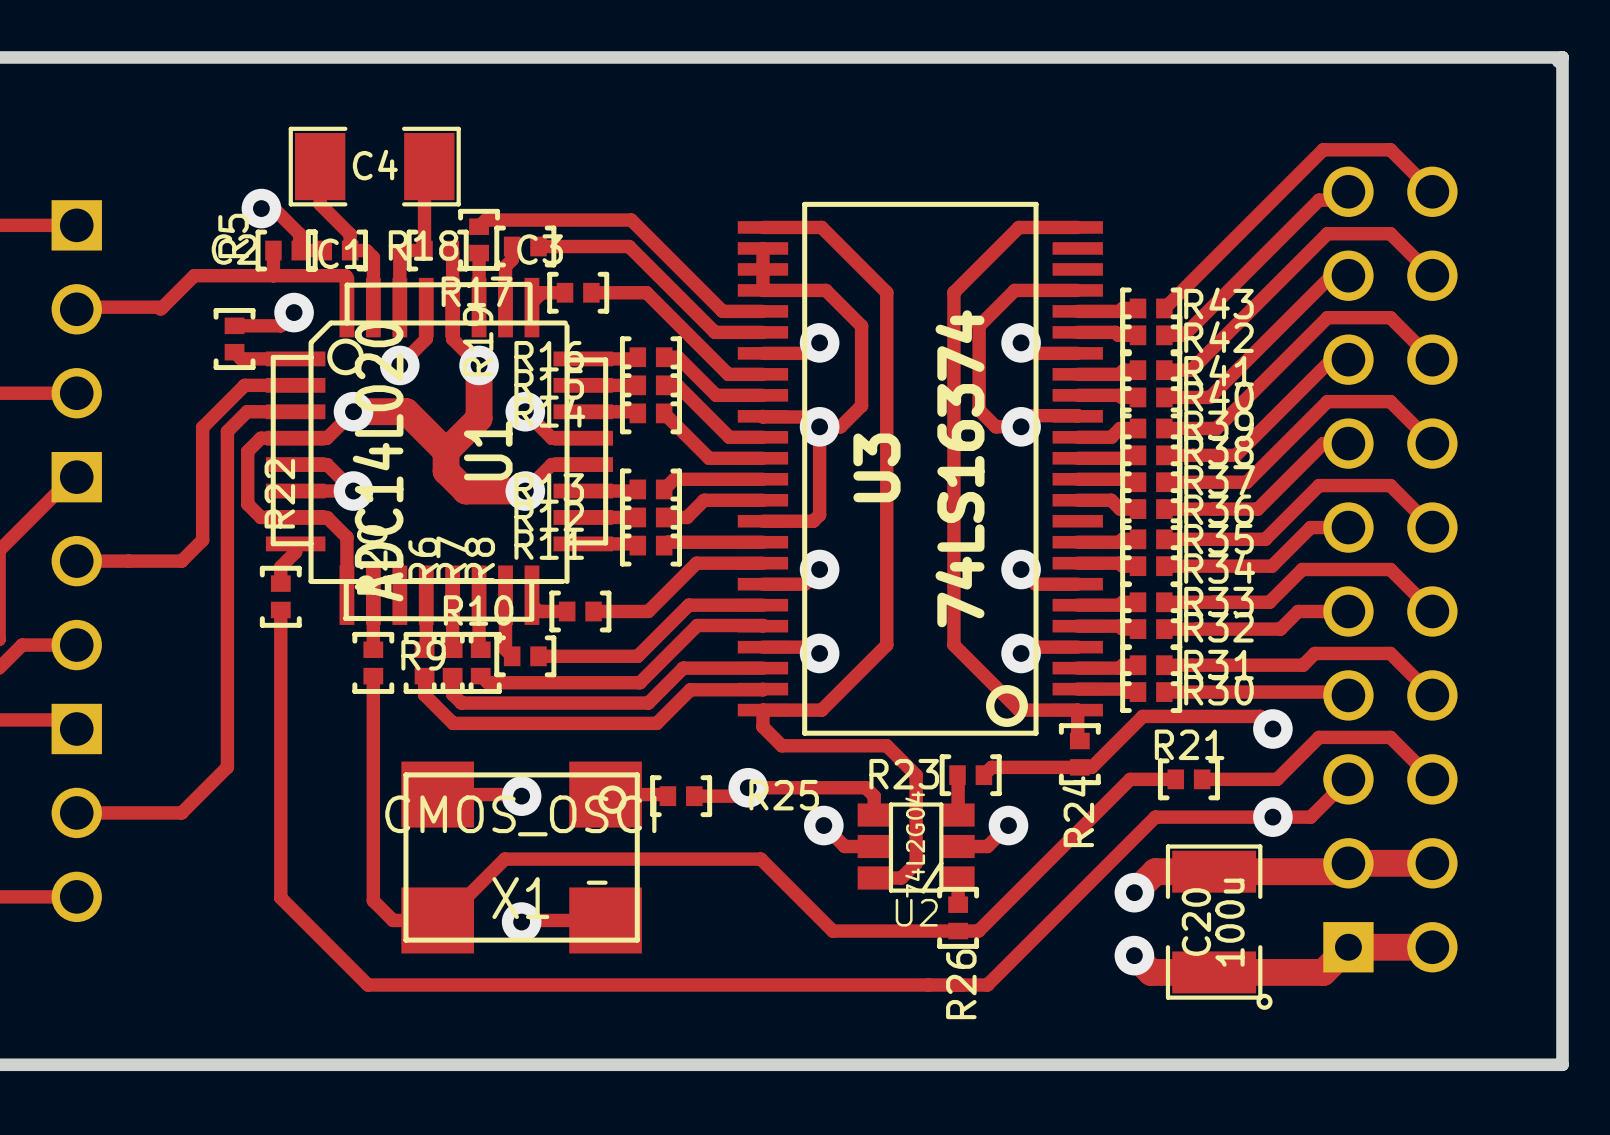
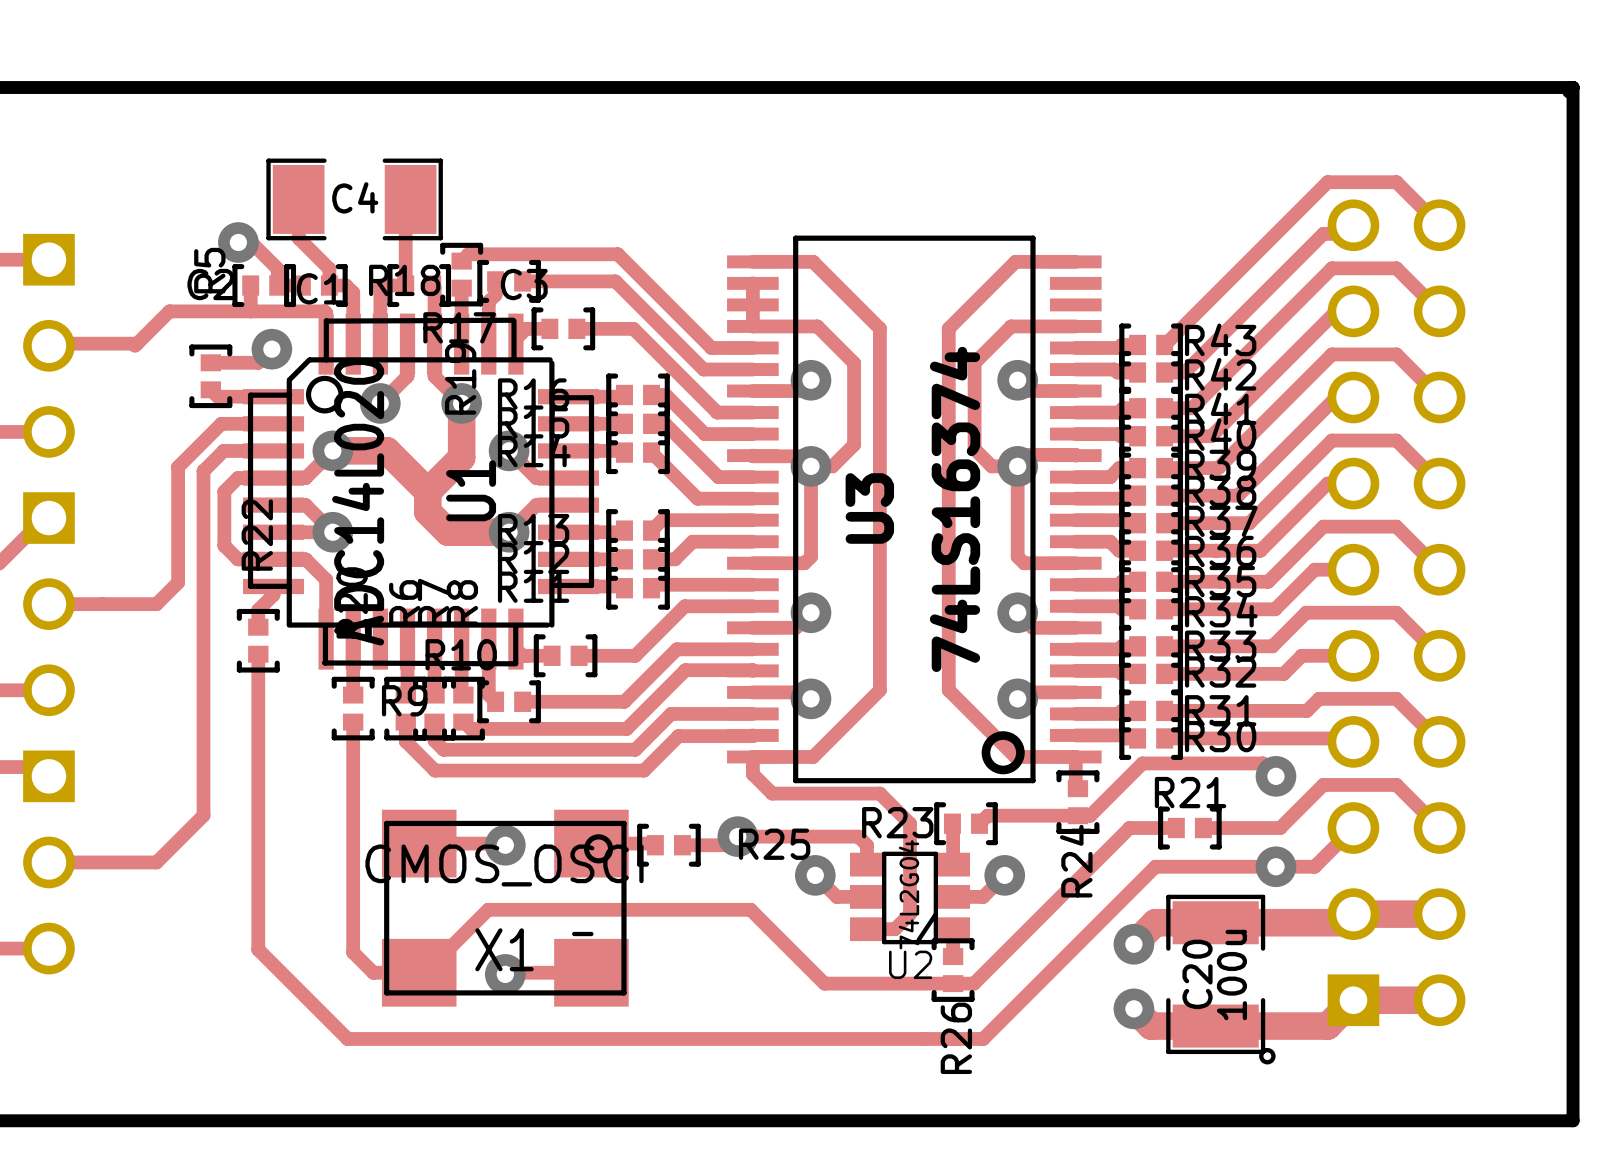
track: none -> (1017, 466) (1017, 556) (1024, 563) (1075, 563)

